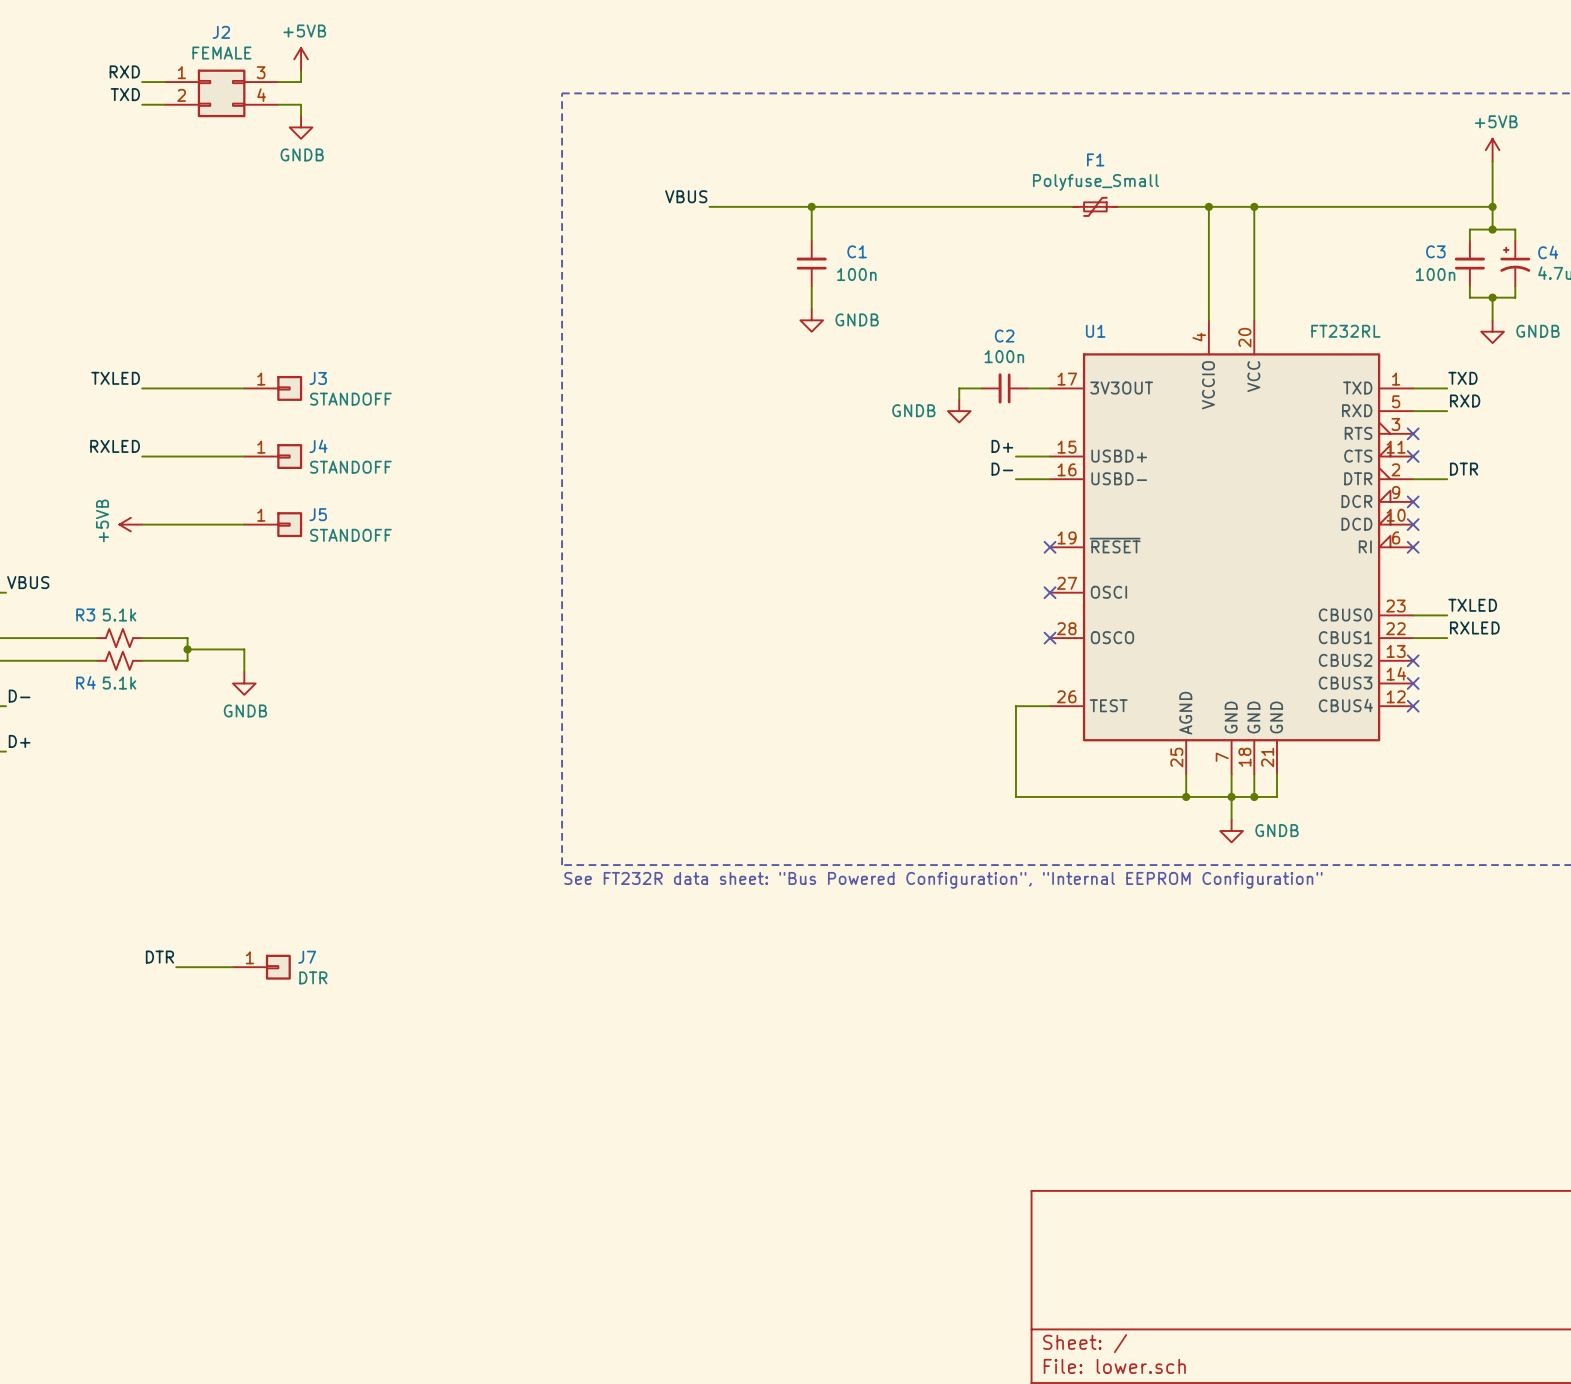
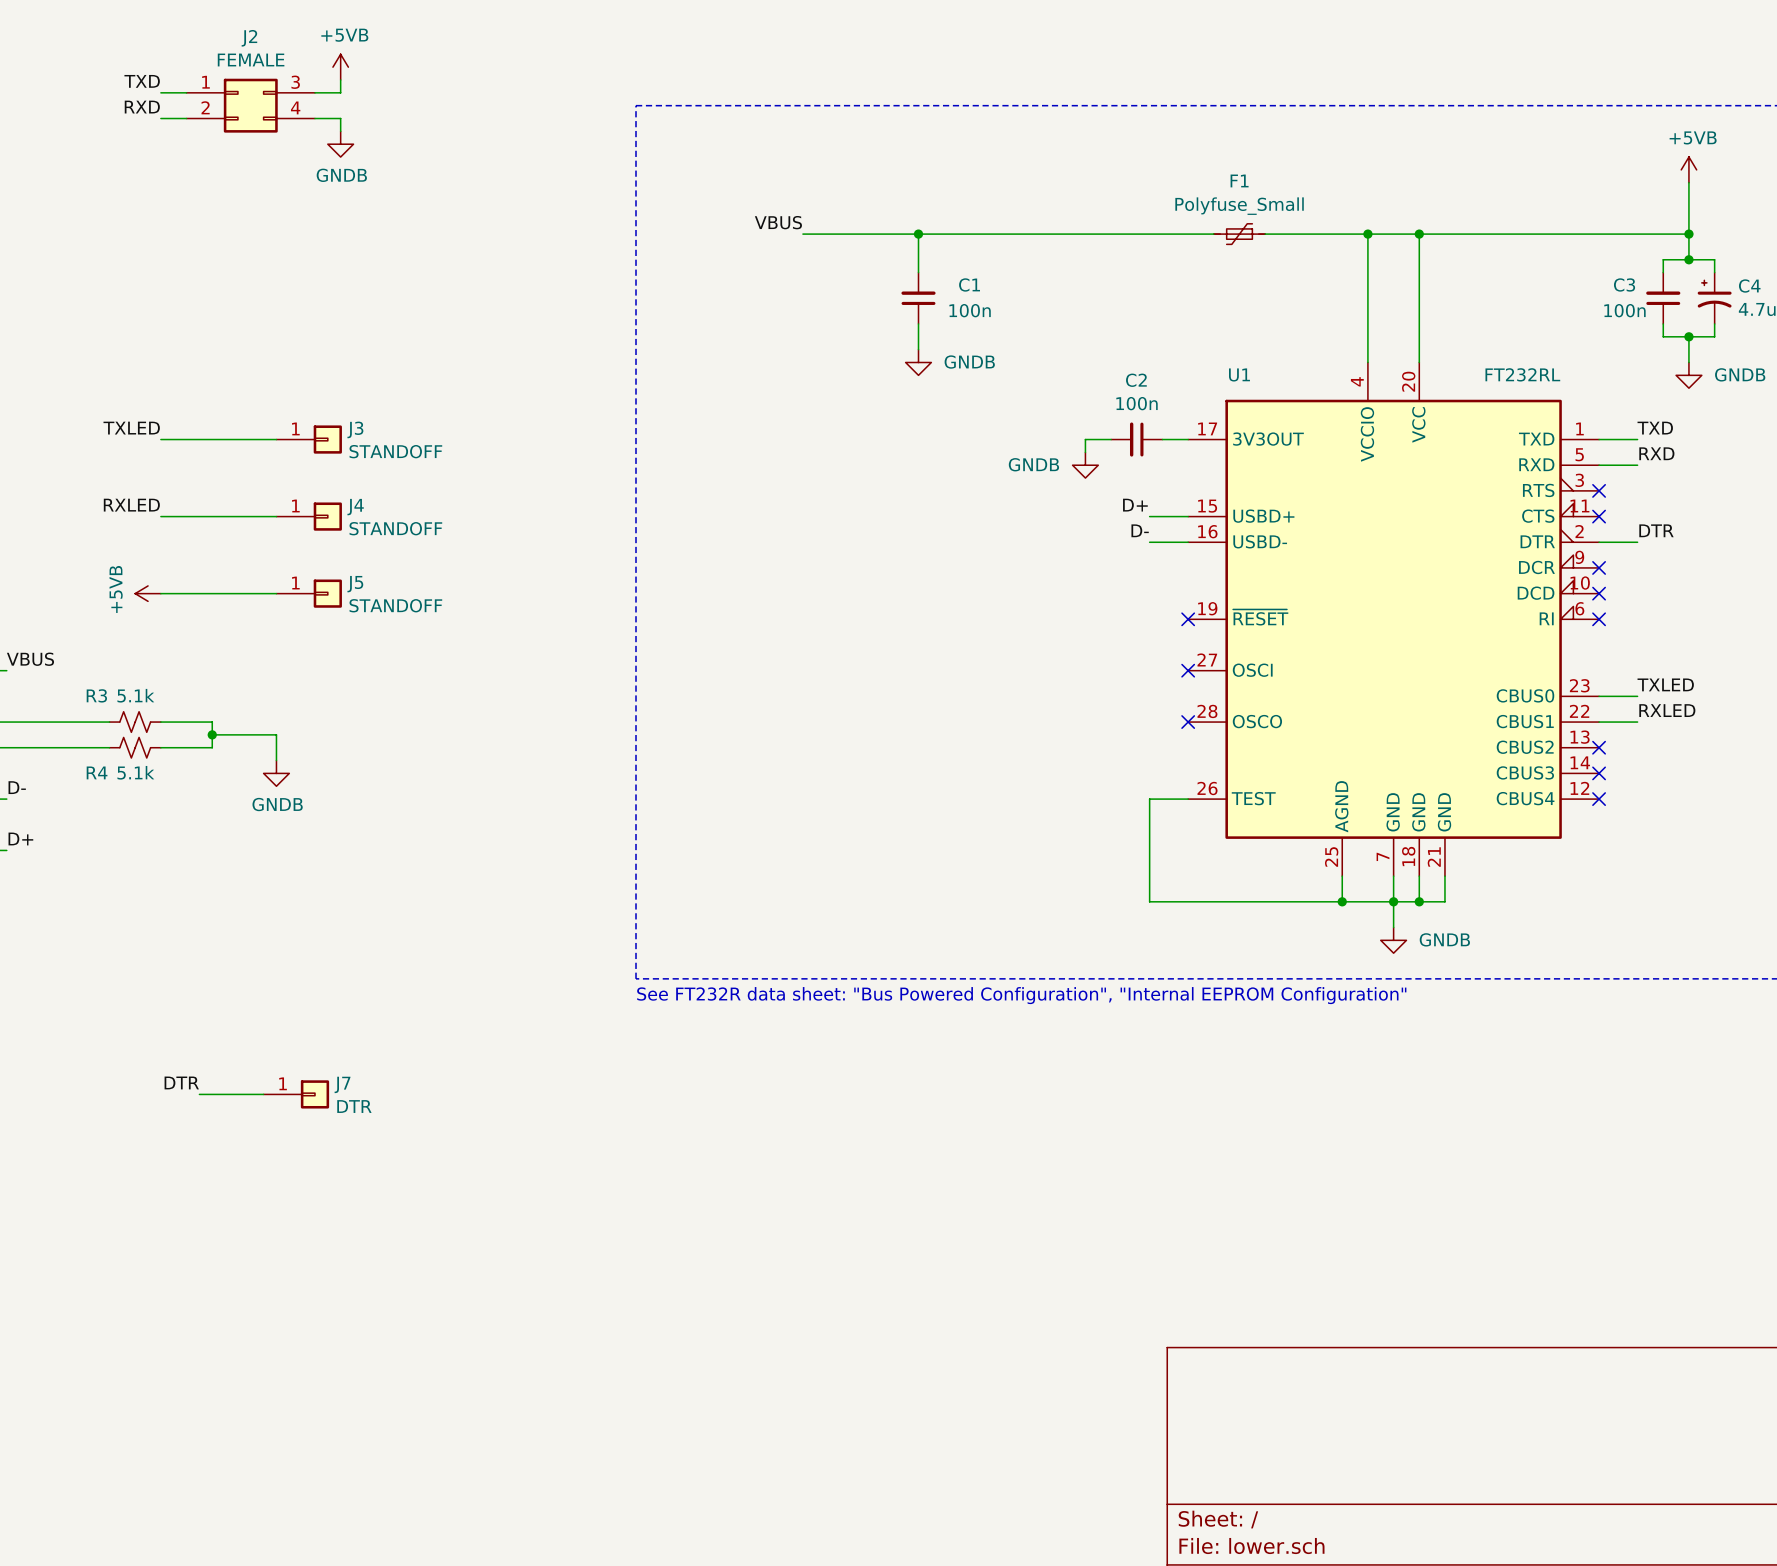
label: RXD (124, 71) -> TXD (142, 81)
label: TXD (125, 94) -> RXD (142, 107)

